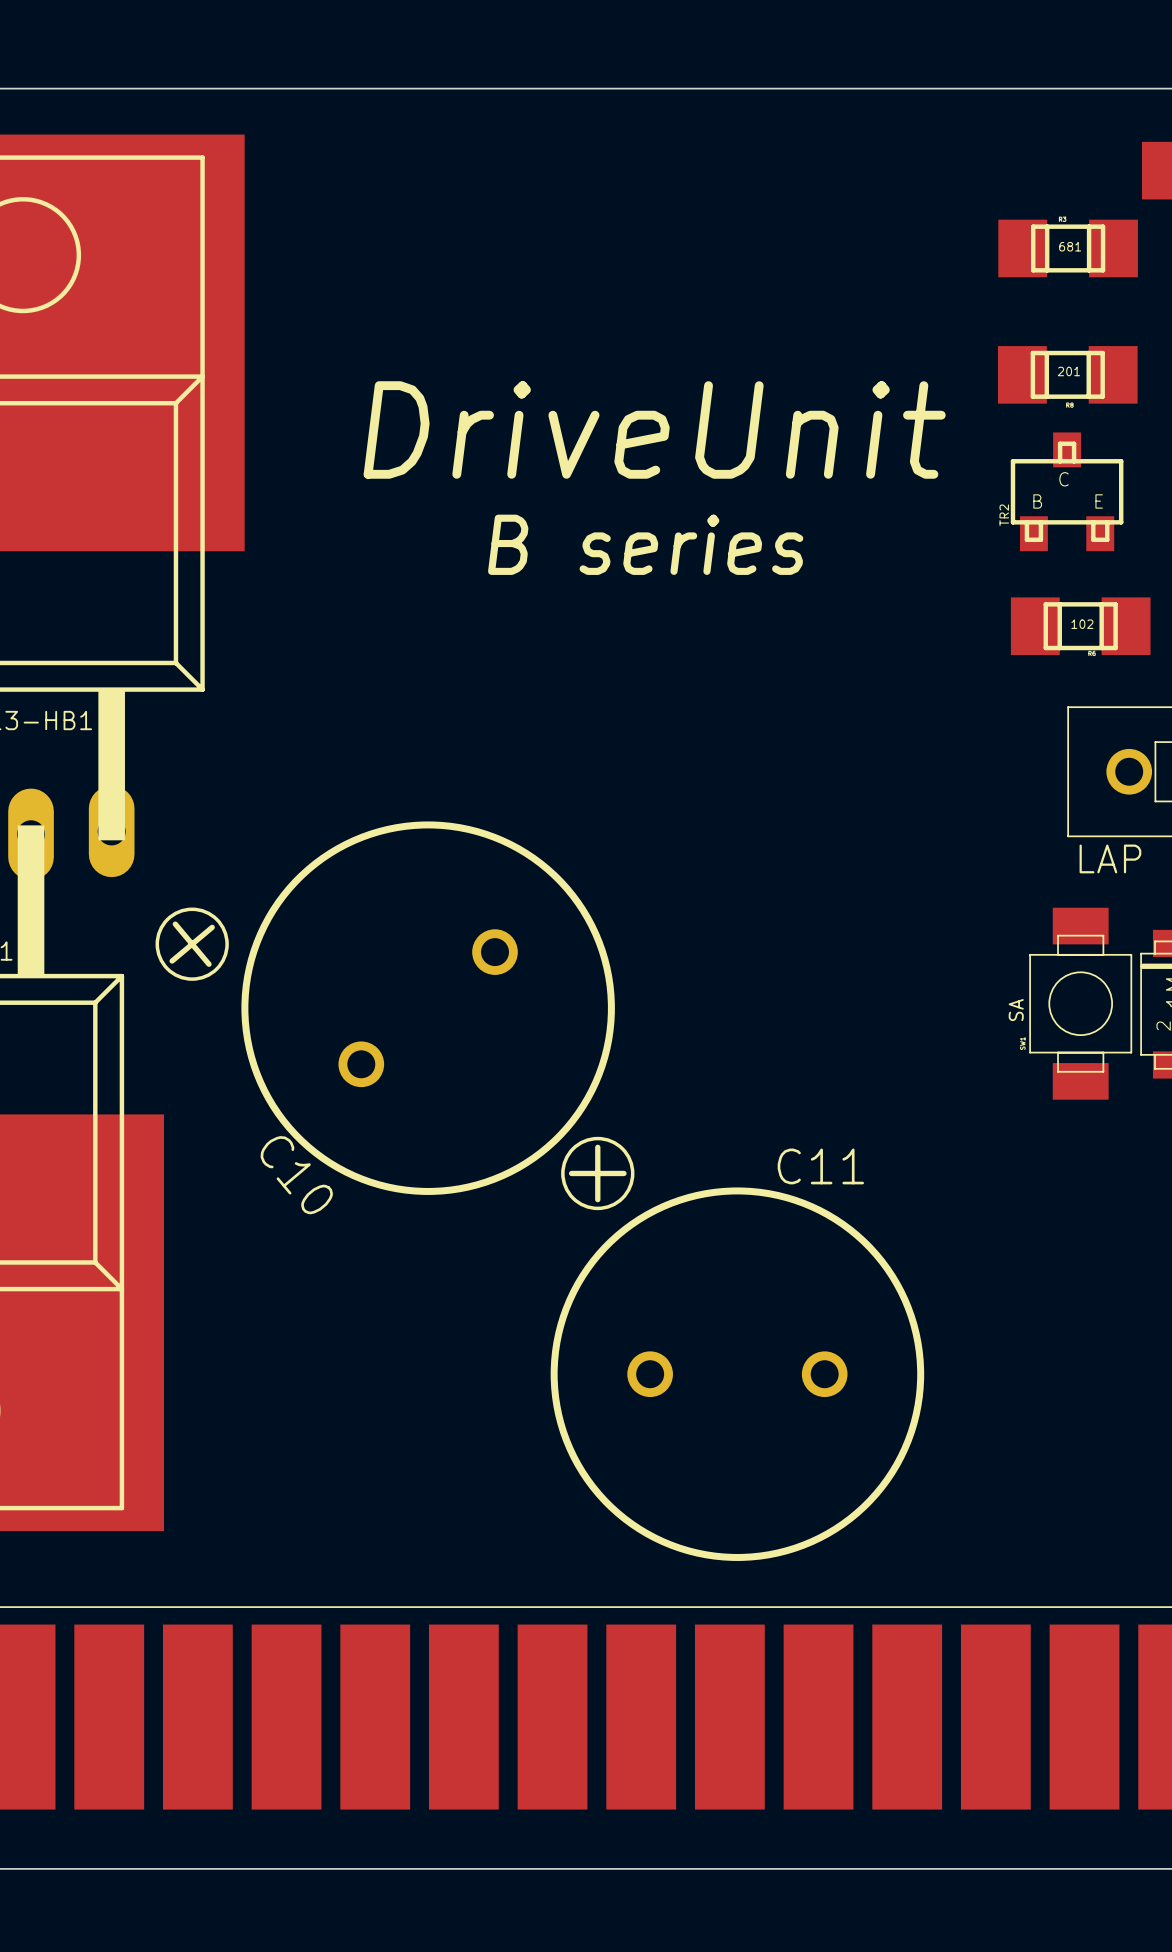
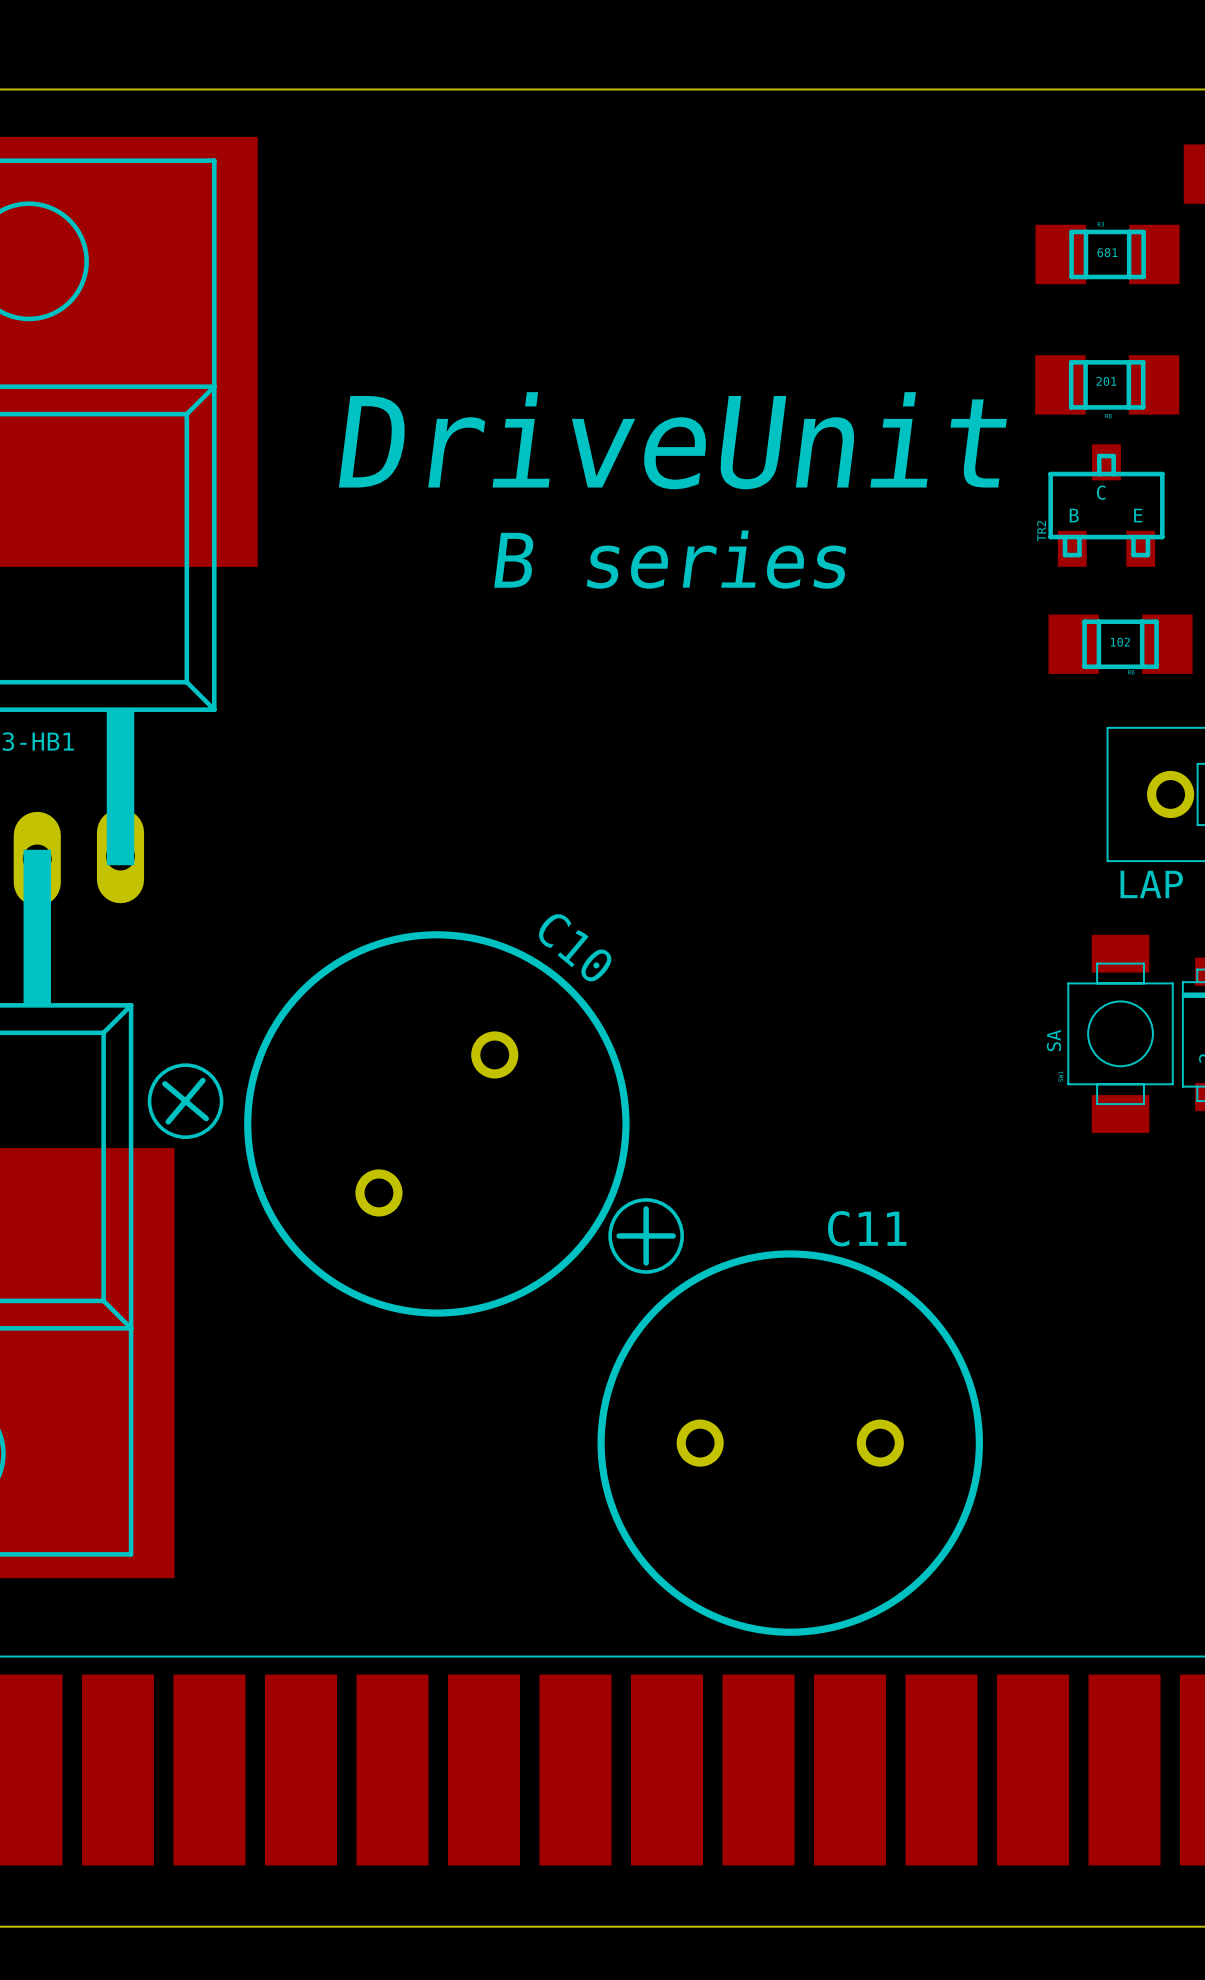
C10 rotation: 0° (385, 1008) -> 10° counterclockwise (388, 1123)
C10 name position: C10 (296, 1175) -> C10 (575, 947)
C11 position: (737, 1348) -> (790, 1416)

